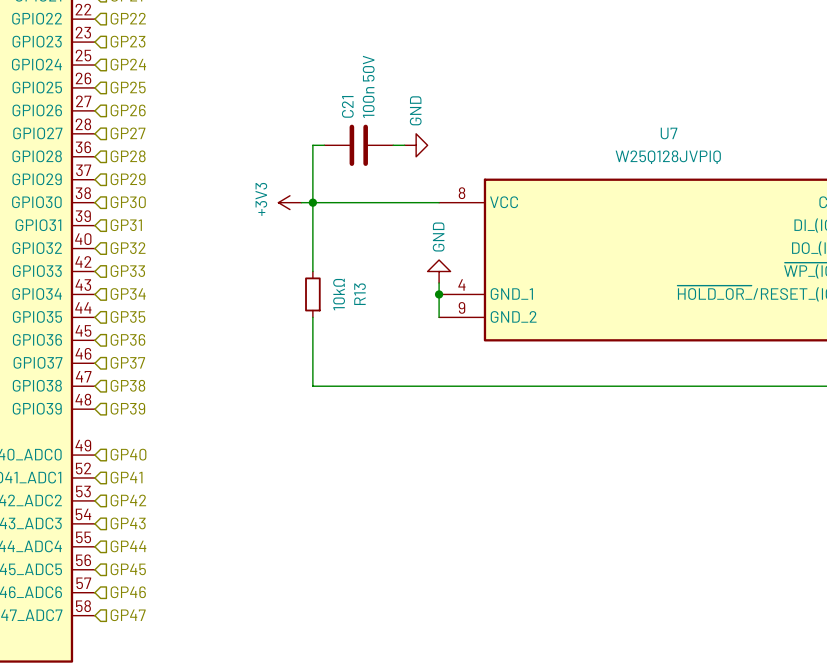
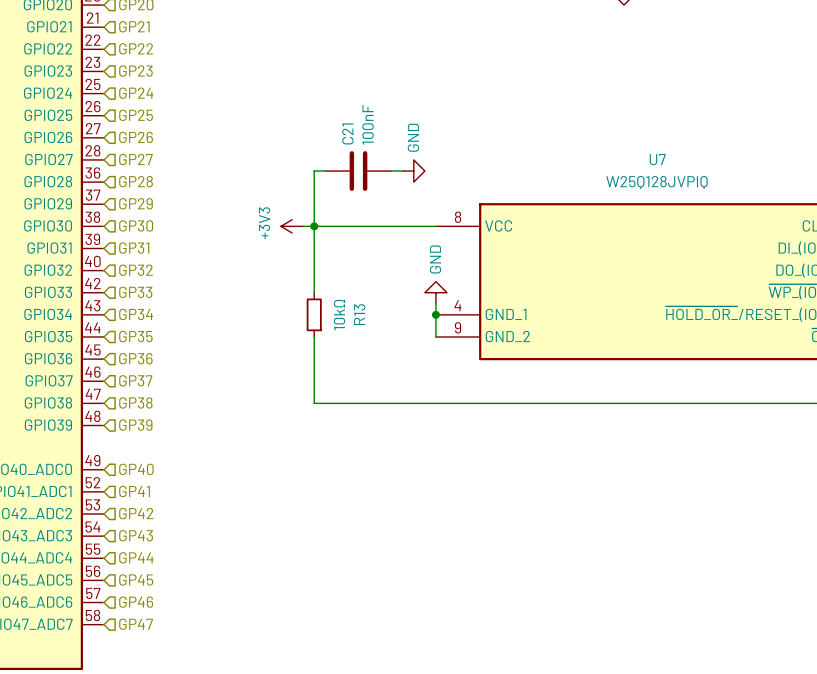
C21 value: 100n 50V (368, 86) -> 100nF (368, 124)

